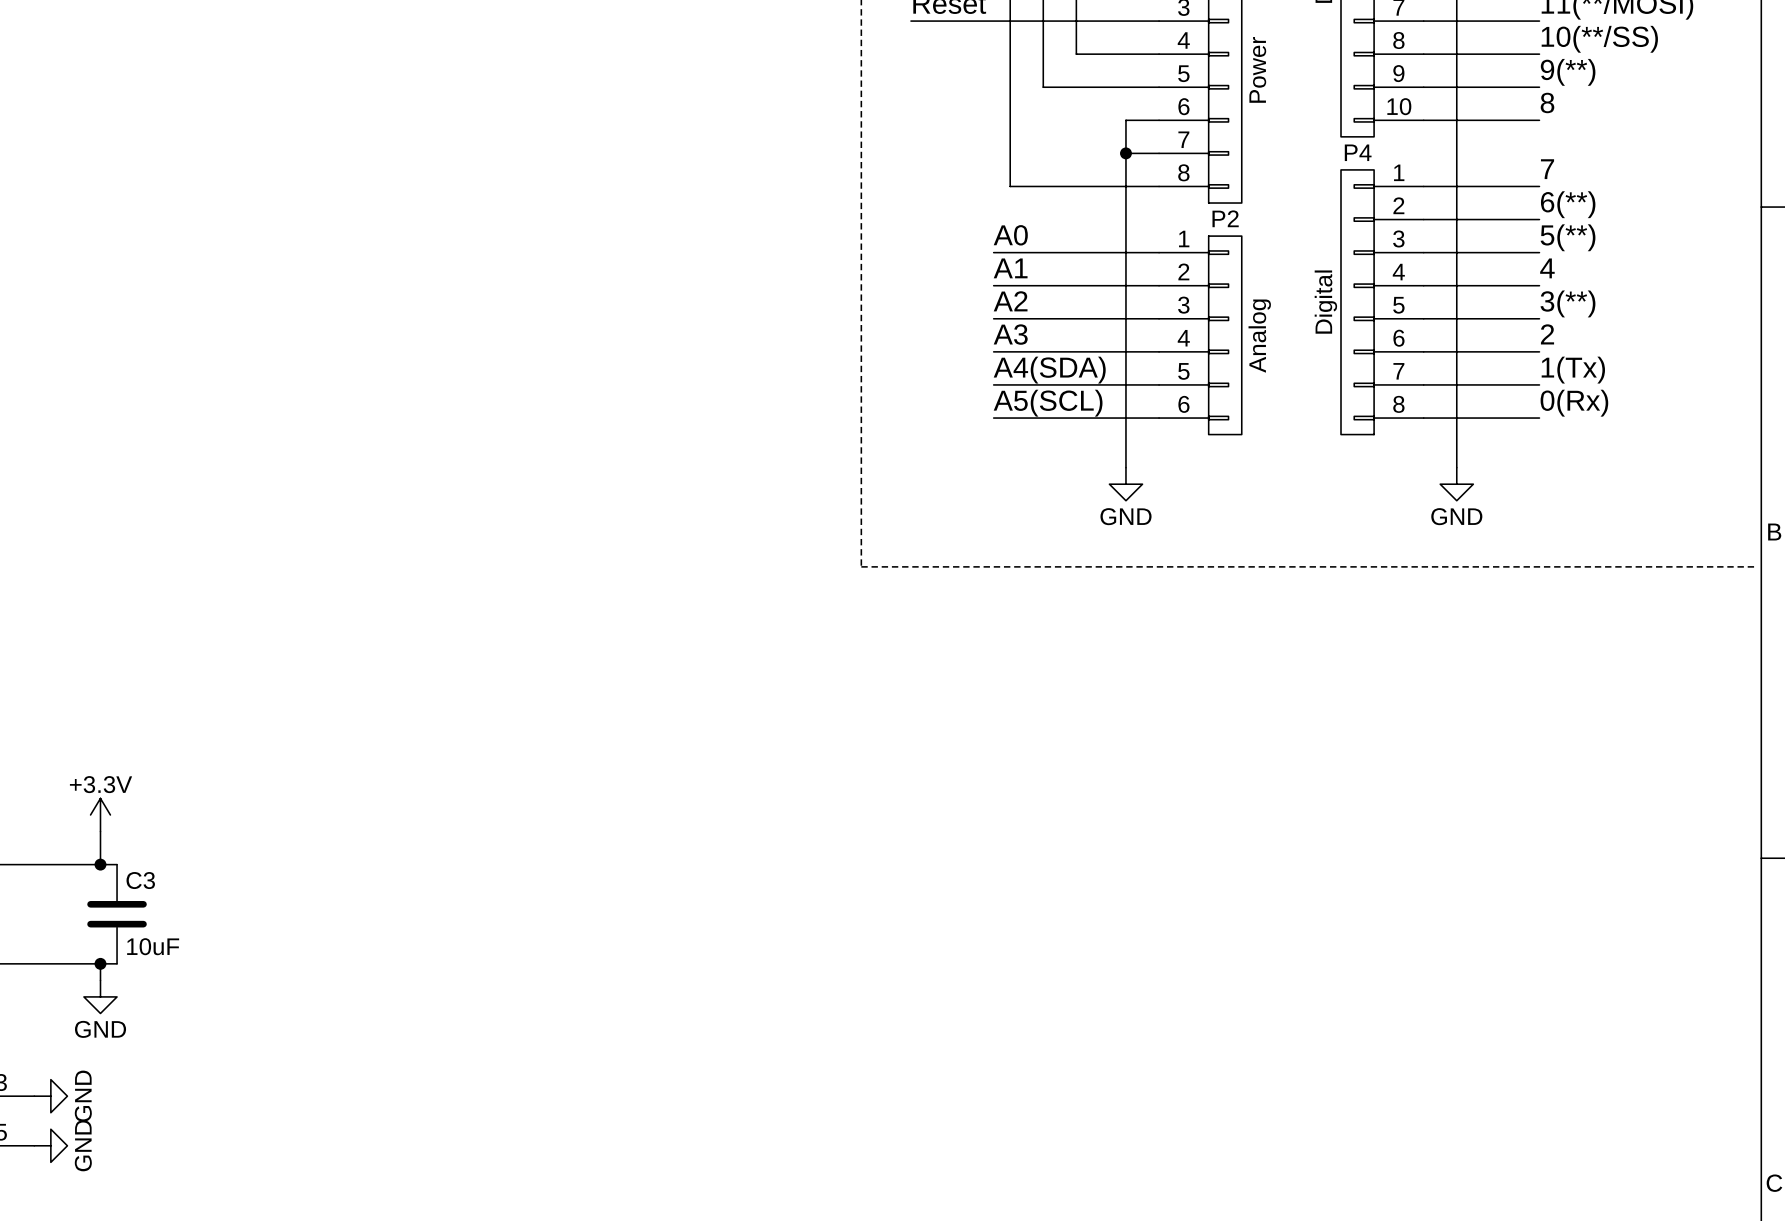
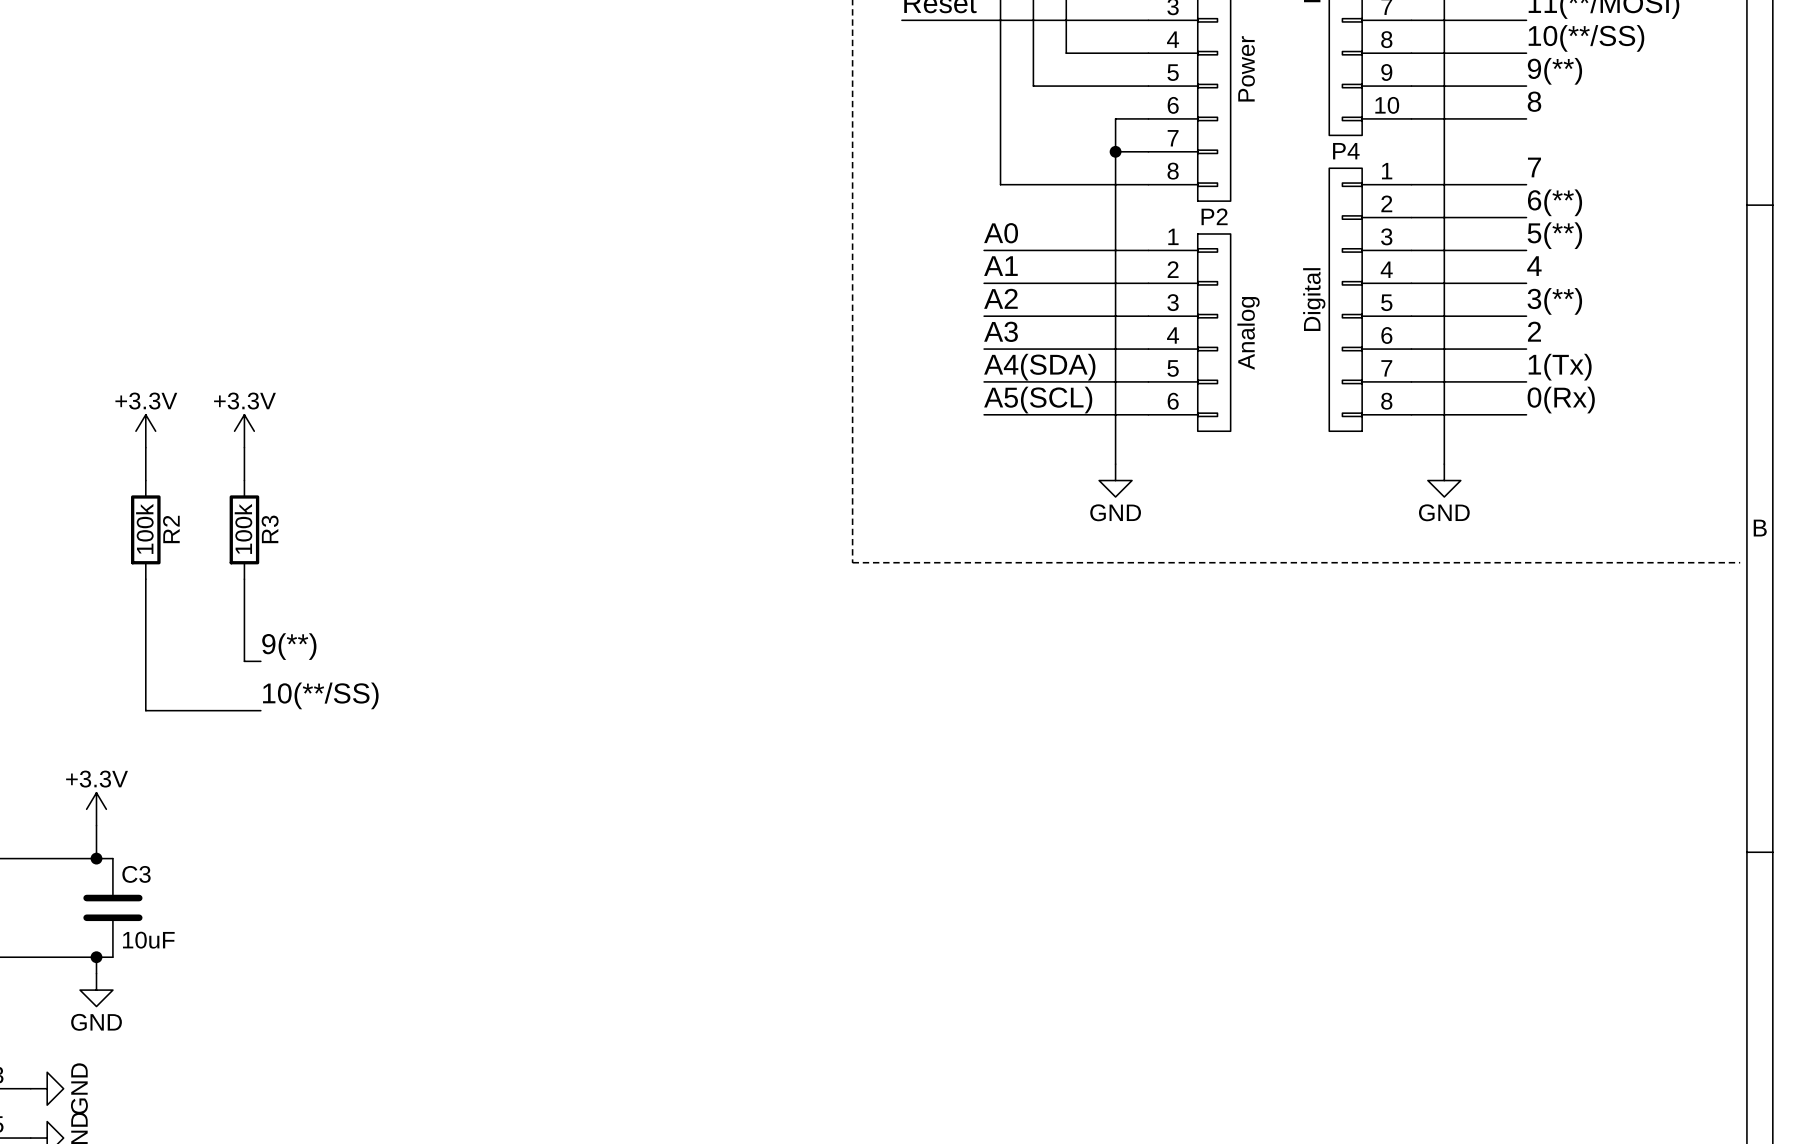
power symbol: none -> +3.3V (145, 431)
power symbol: none -> +3.3V (244, 431)
wire: none -> (145, 447) (145, 480)
wire: none -> (244, 447) (244, 480)
R2: none -> 100k (145, 529)
R3: none -> 100k (244, 529)
wire: none -> (145, 579) (145, 710) (260, 710)
wire: none -> (244, 579) (244, 661) (260, 661)
label: none -> 9(**) (289, 646)
label: none -> 10(**/SS) (320, 695)

